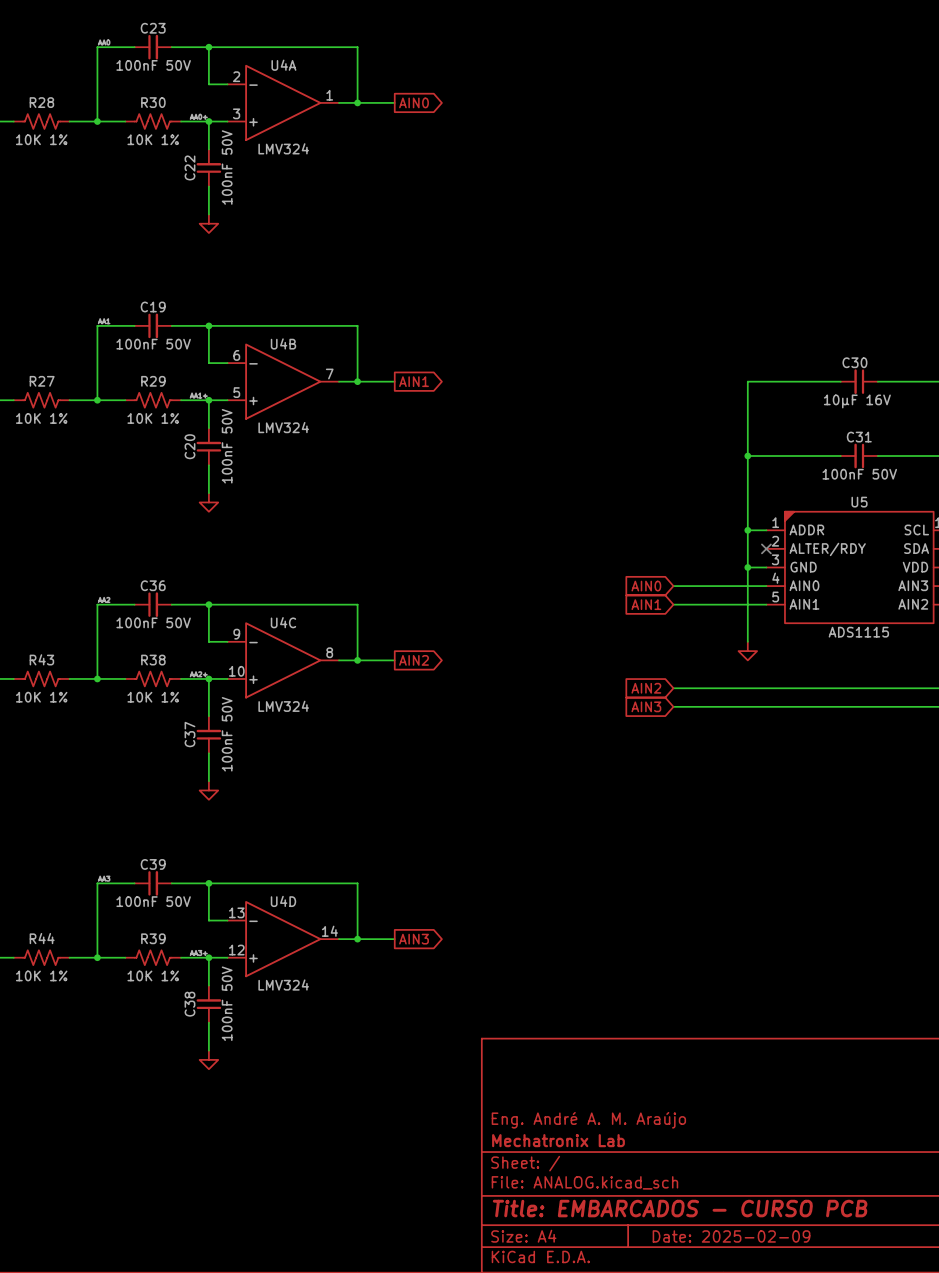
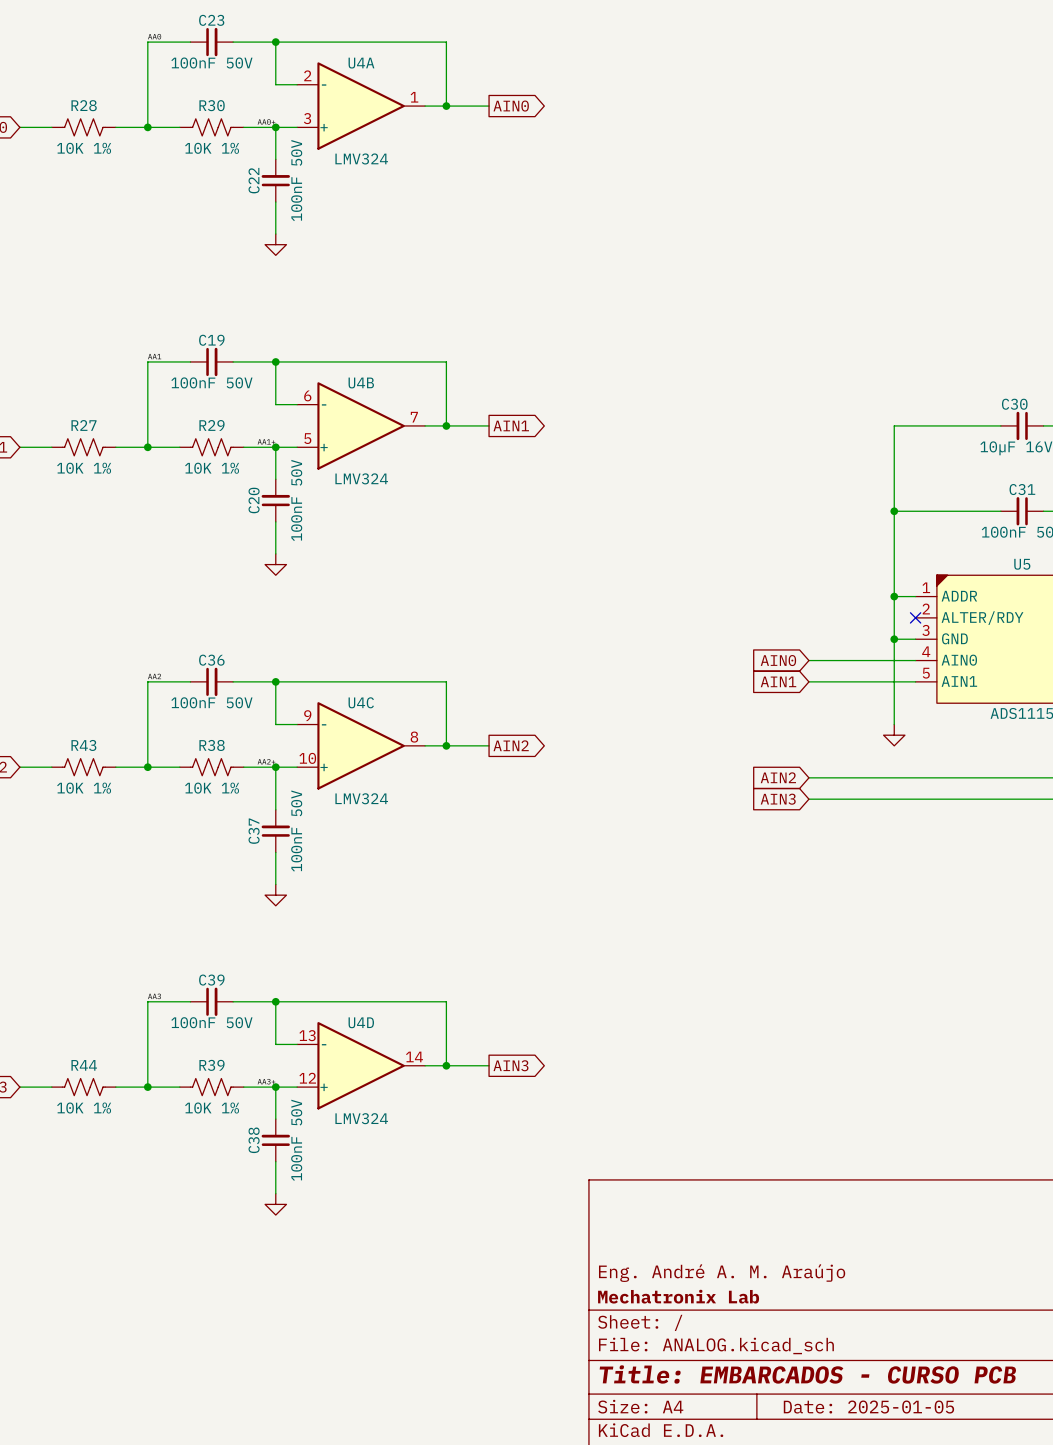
title block: Date: 2025-02-09 (731, 1236) -> Date: 2025-01-05 (868, 1407)

